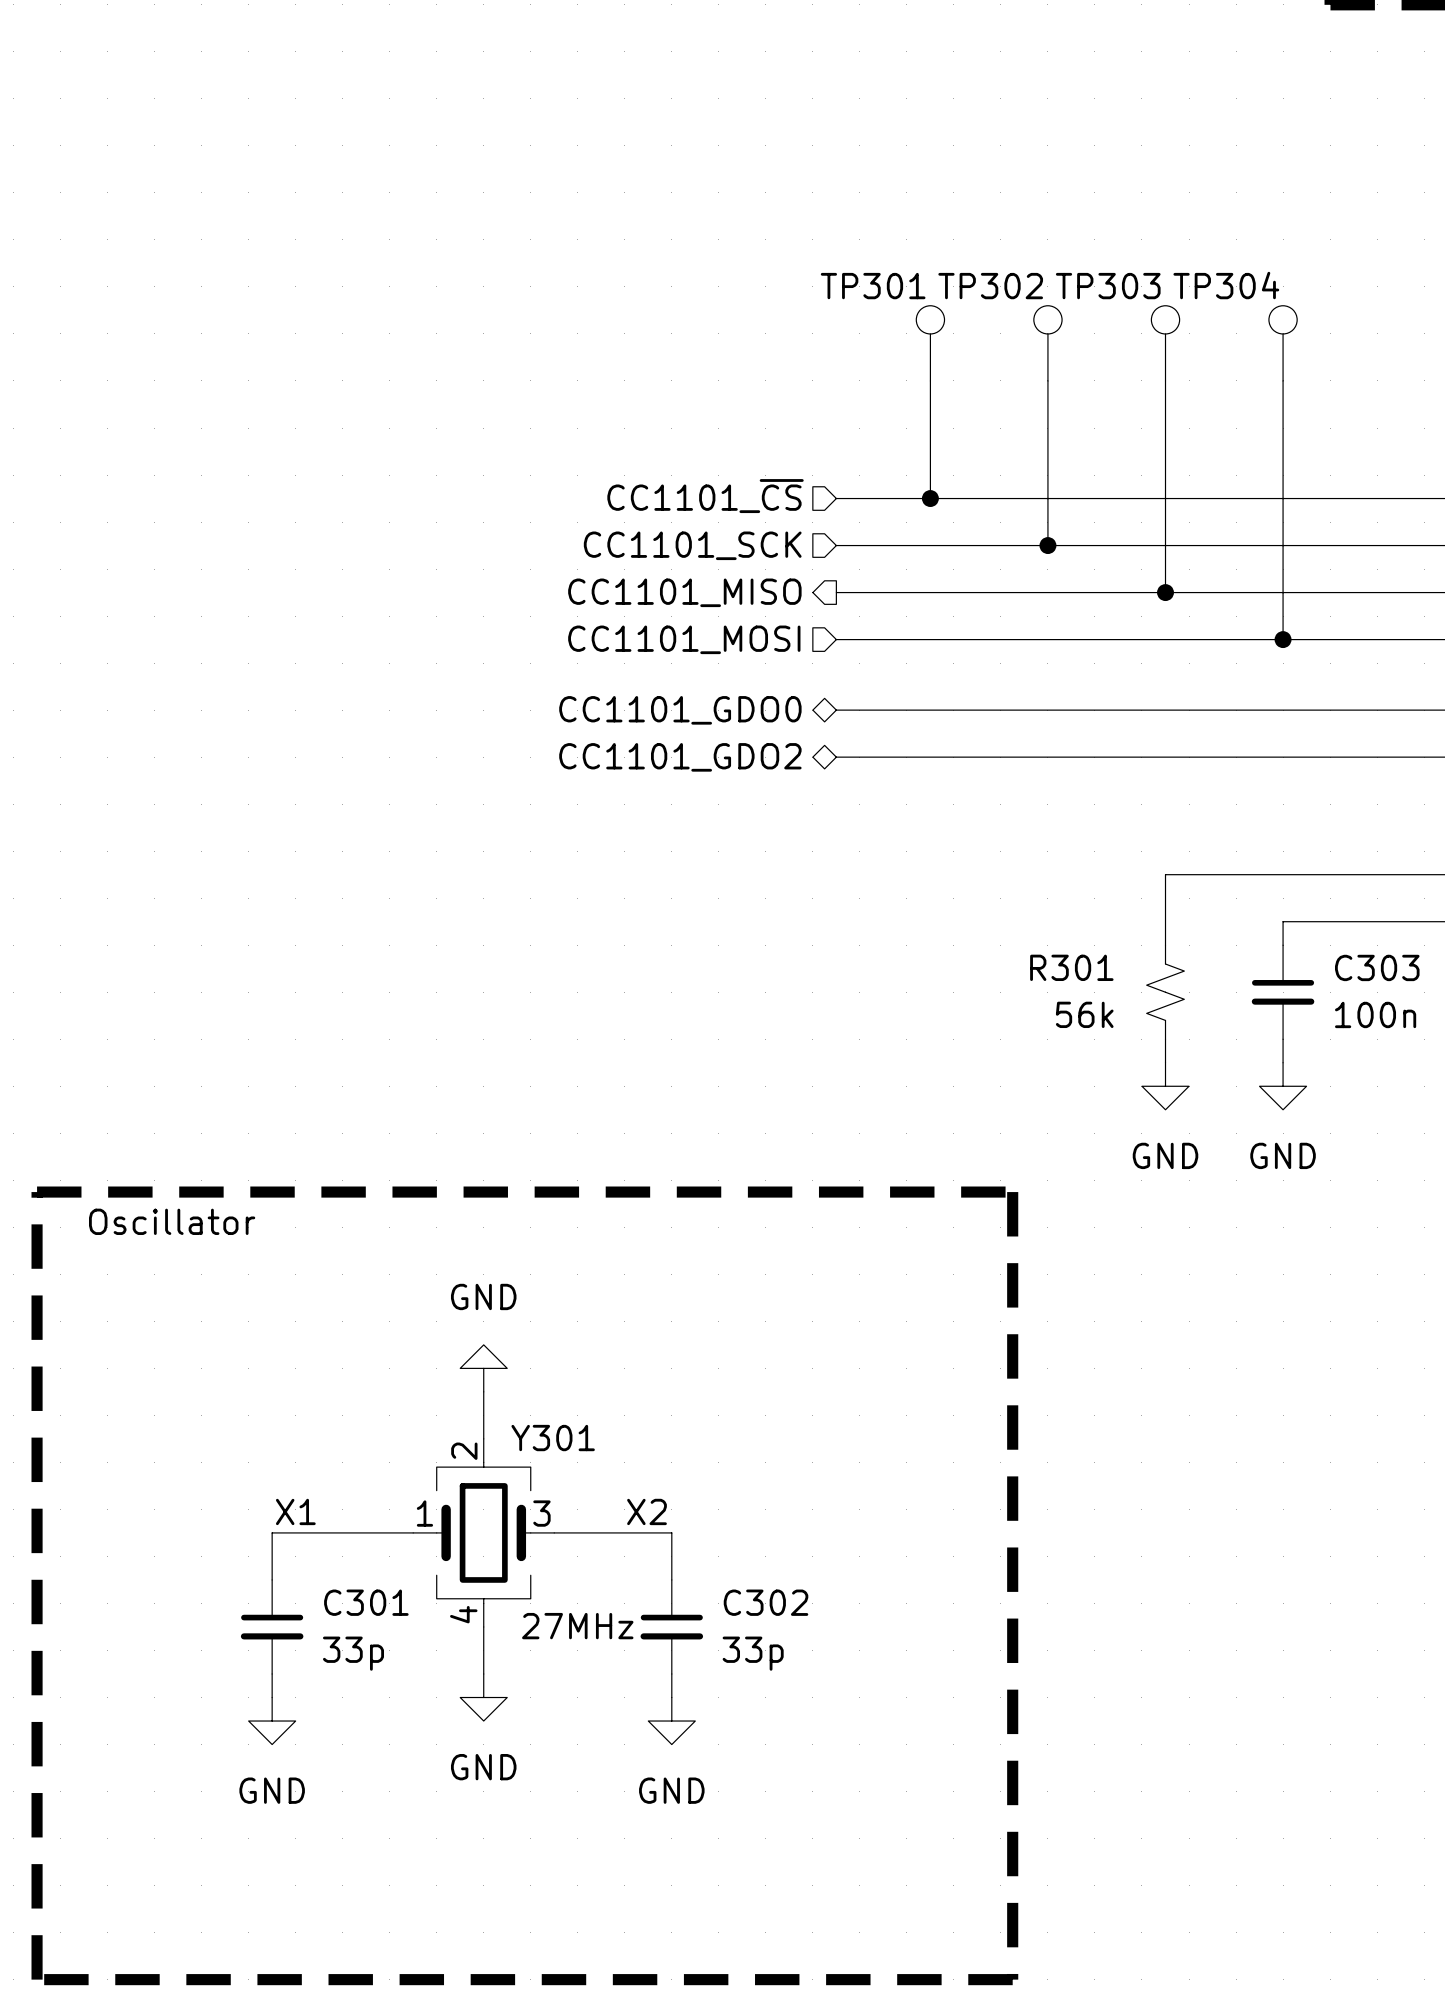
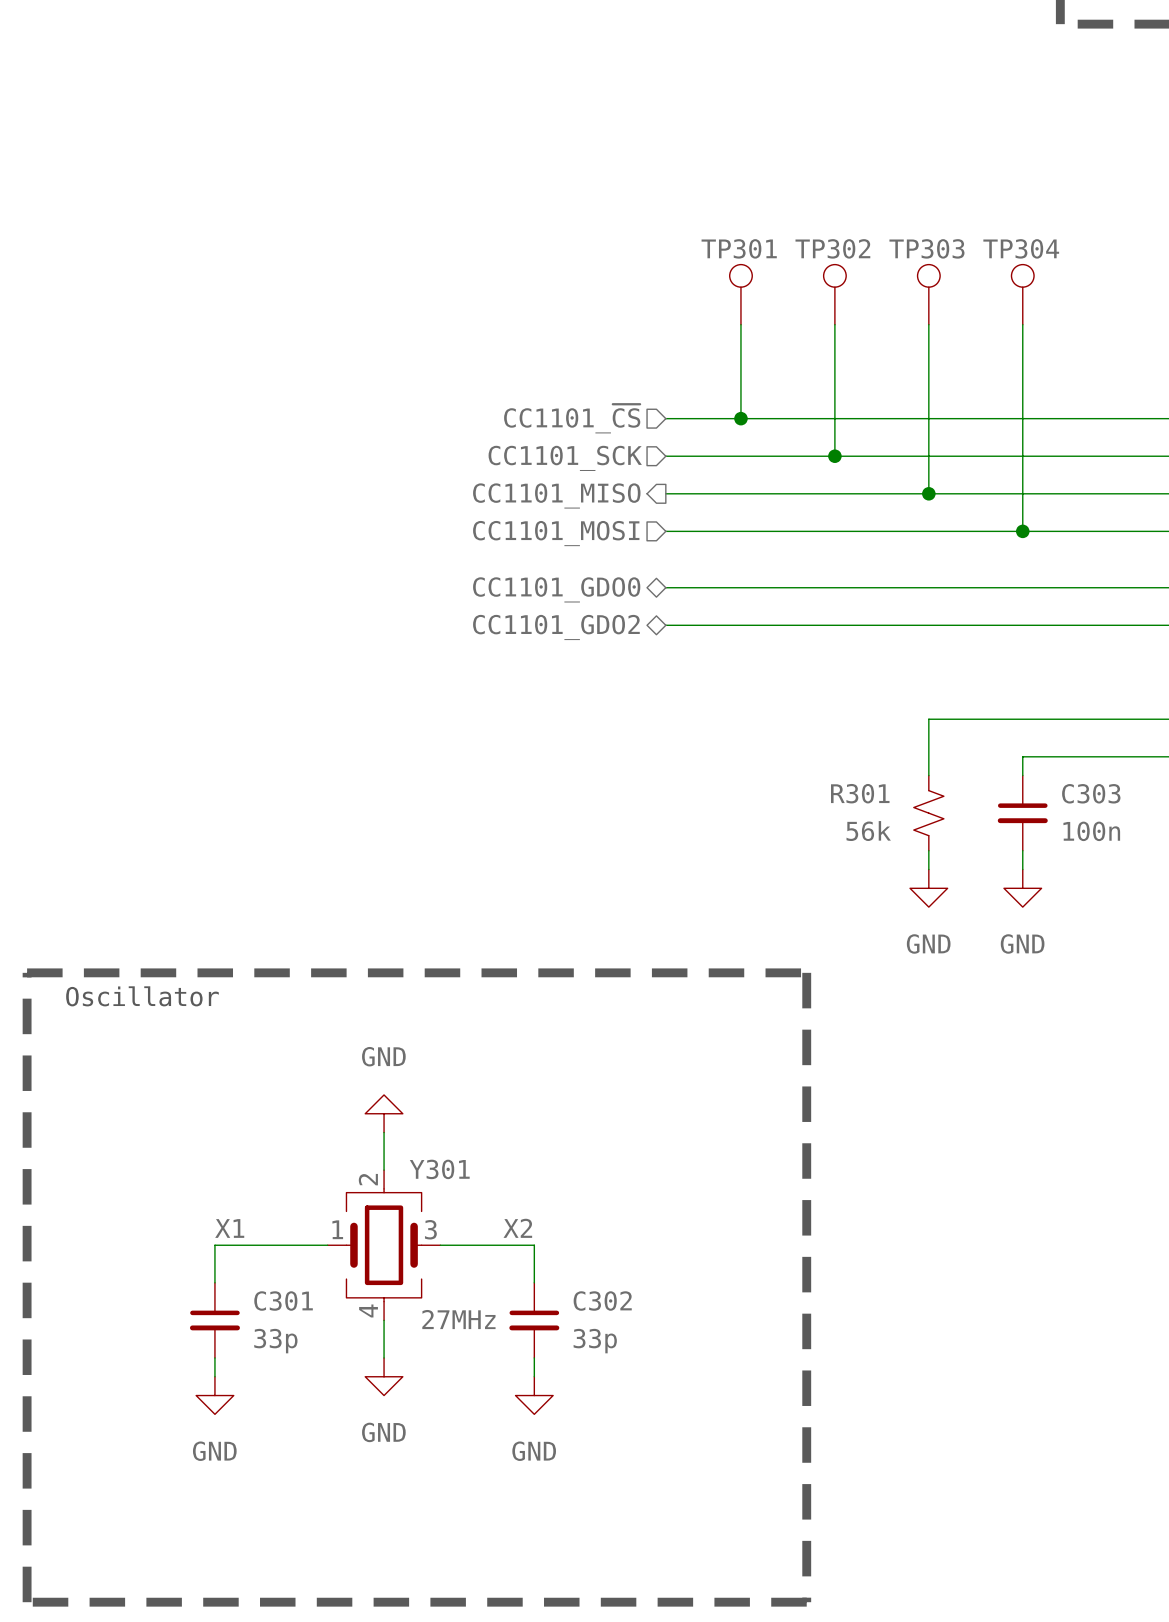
TP304 name position: TP304 (1226, 285) -> TP304 (1021, 248)
TP301 name position: TP301 (873, 286) -> TP301 (739, 248)
TP302 name position: TP302 (990, 286) -> TP302 (832, 248)
TP303 name position: TP303 (1108, 286) -> TP303 (926, 248)

